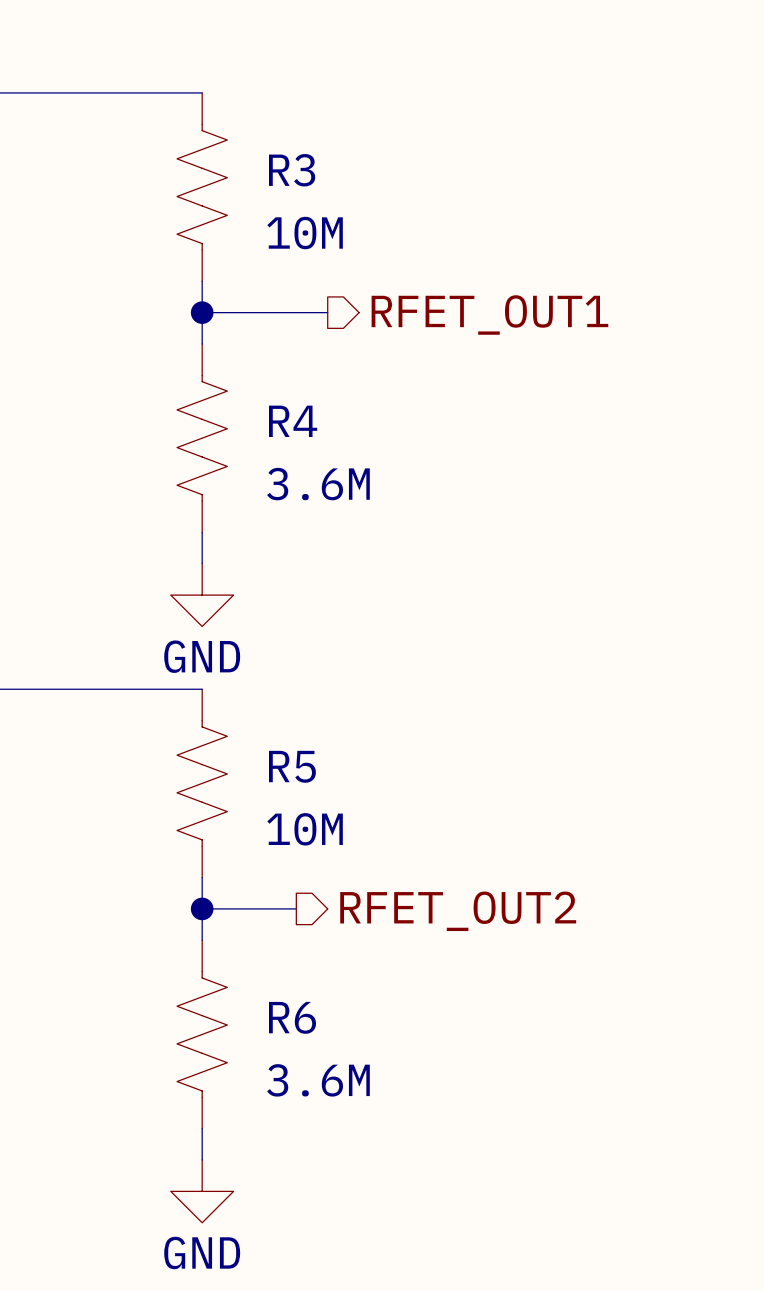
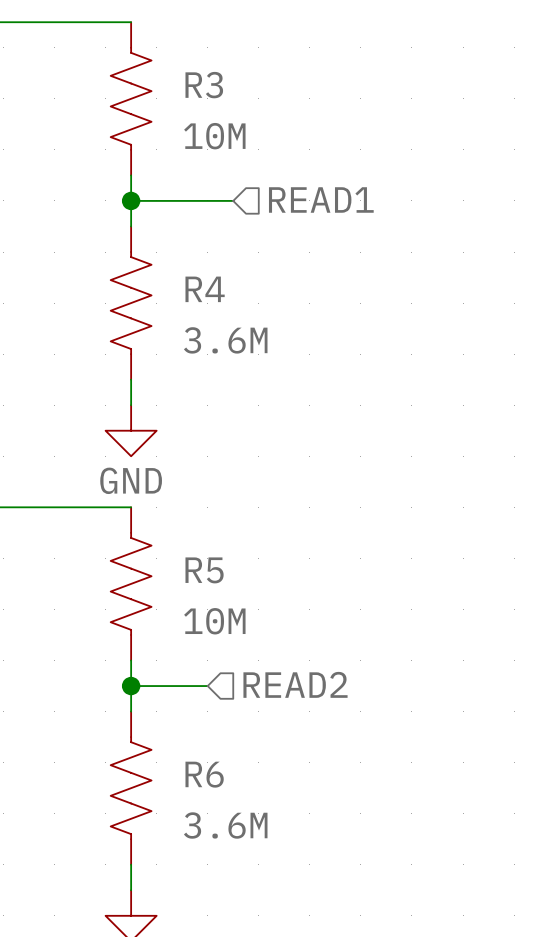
hierarchical label shape: output (489, 315) -> input (321, 199)
hierarchical label: RFET_OUT1 (489, 315) -> READ1 (321, 199)
hierarchical label shape: output (458, 911) -> input (295, 684)
hierarchical label: RFET_OUT2 (458, 911) -> READ2 (295, 684)

